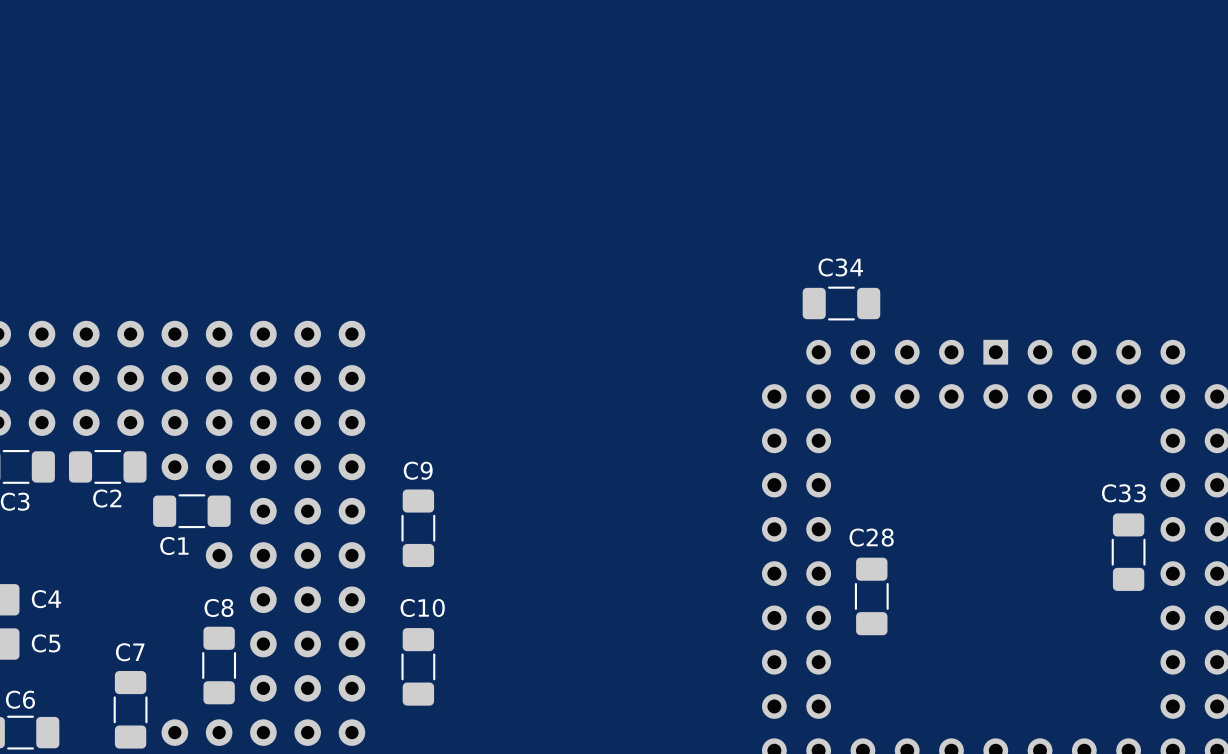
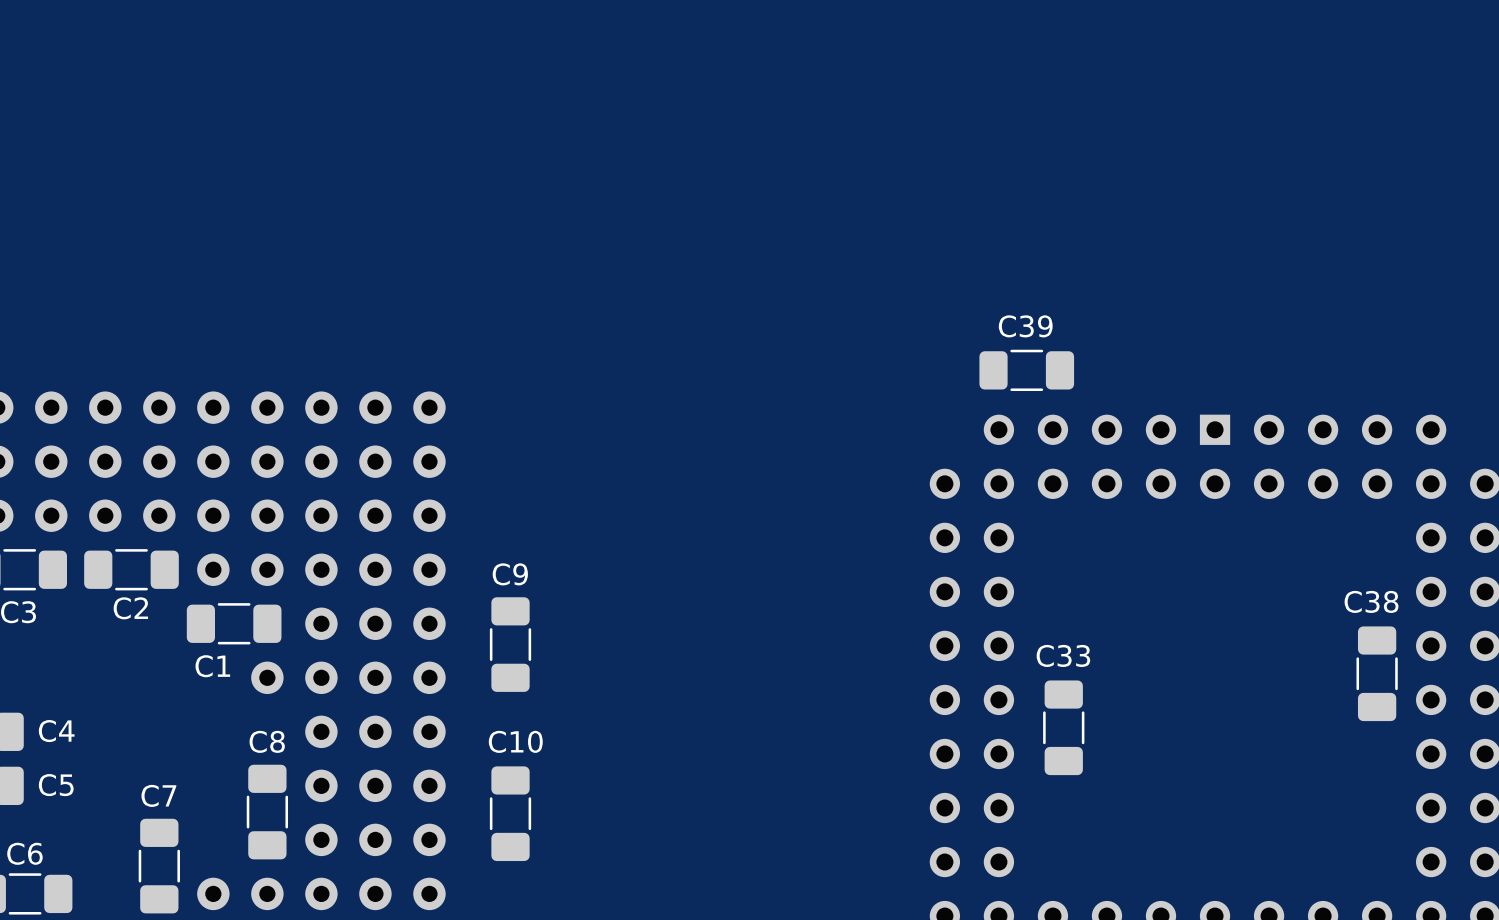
C34 name: C34 (840, 267) -> C39 (1025, 326)
C33 name: C33 (1123, 493) -> C38 (1371, 601)
C28 name: C28 (871, 537) -> C33 (1063, 655)

